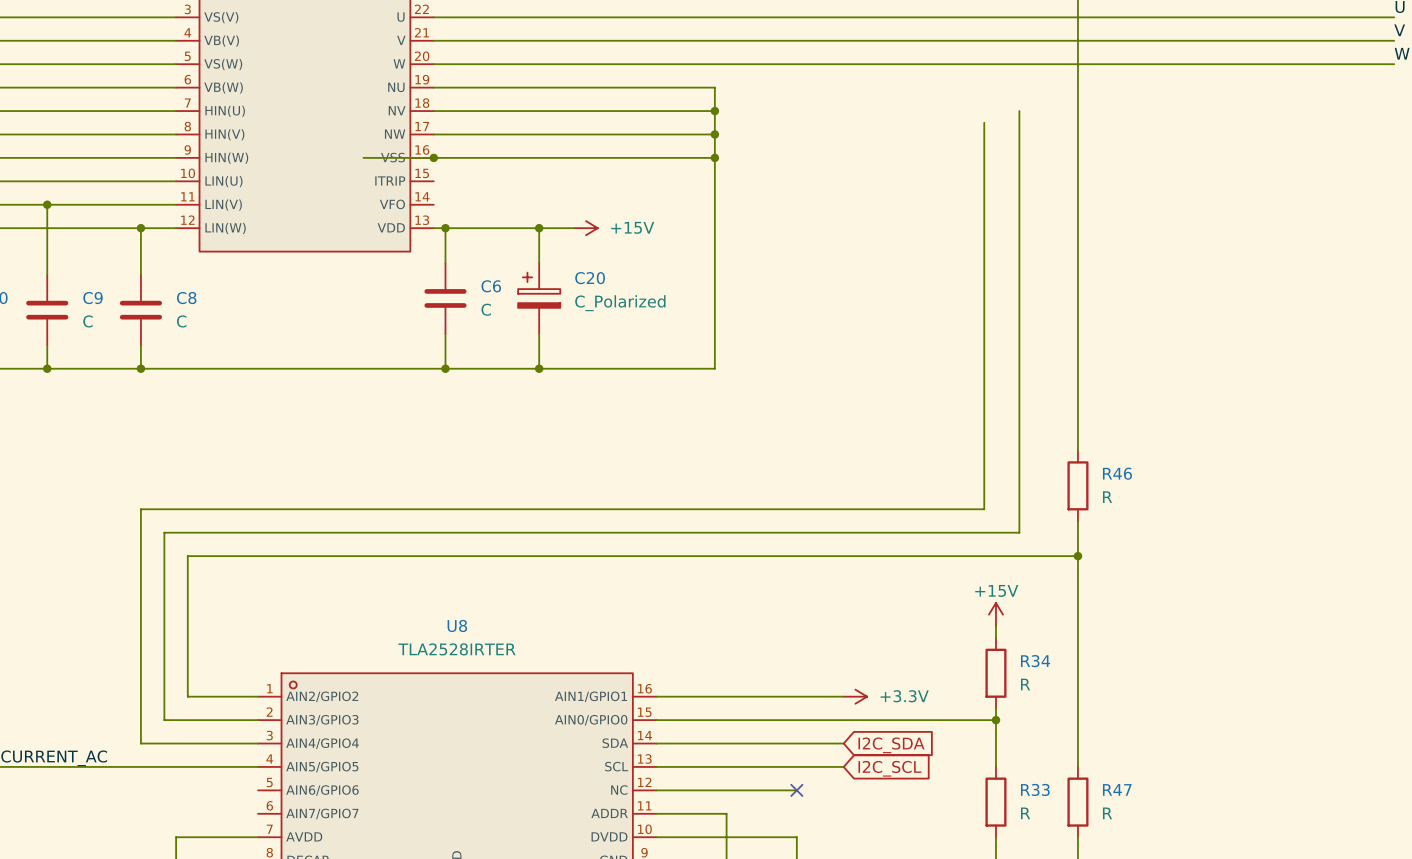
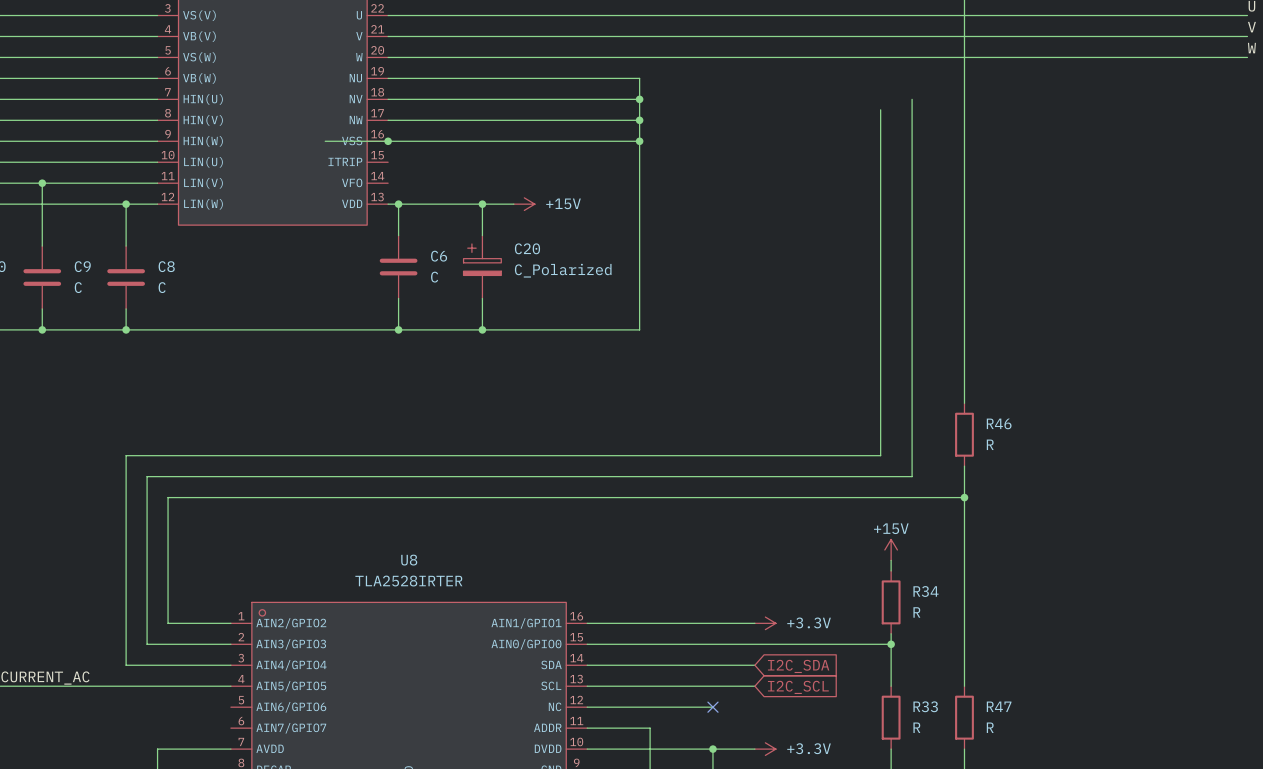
wire: none -> (712, 749) (754, 749)
junction: none -> (712, 749)
power symbol: none -> +3.3V (765, 749)

